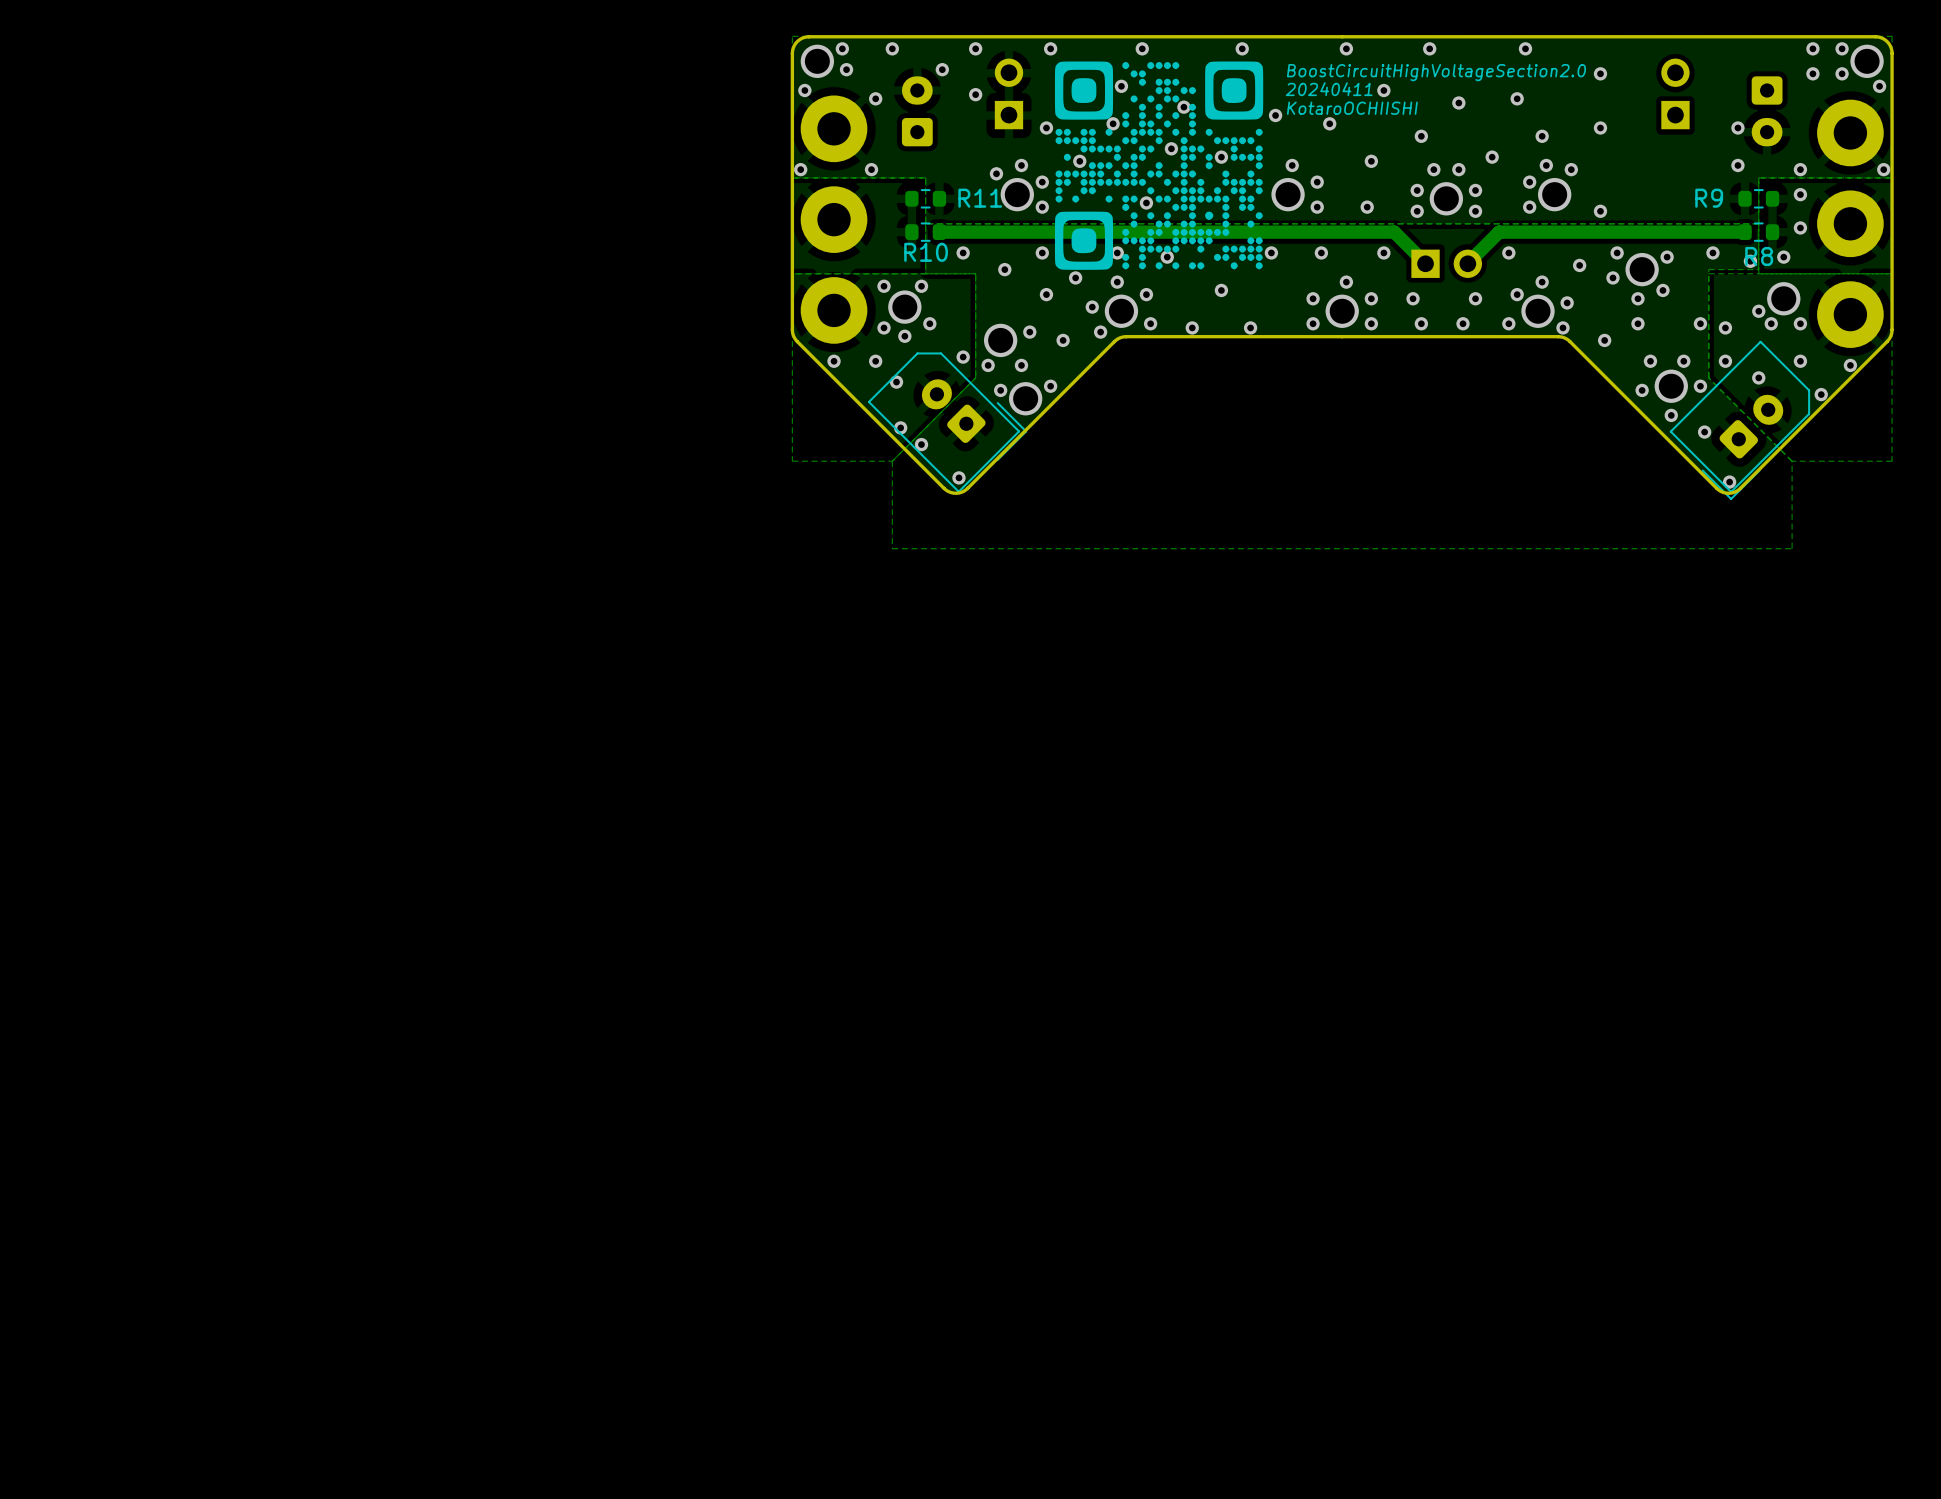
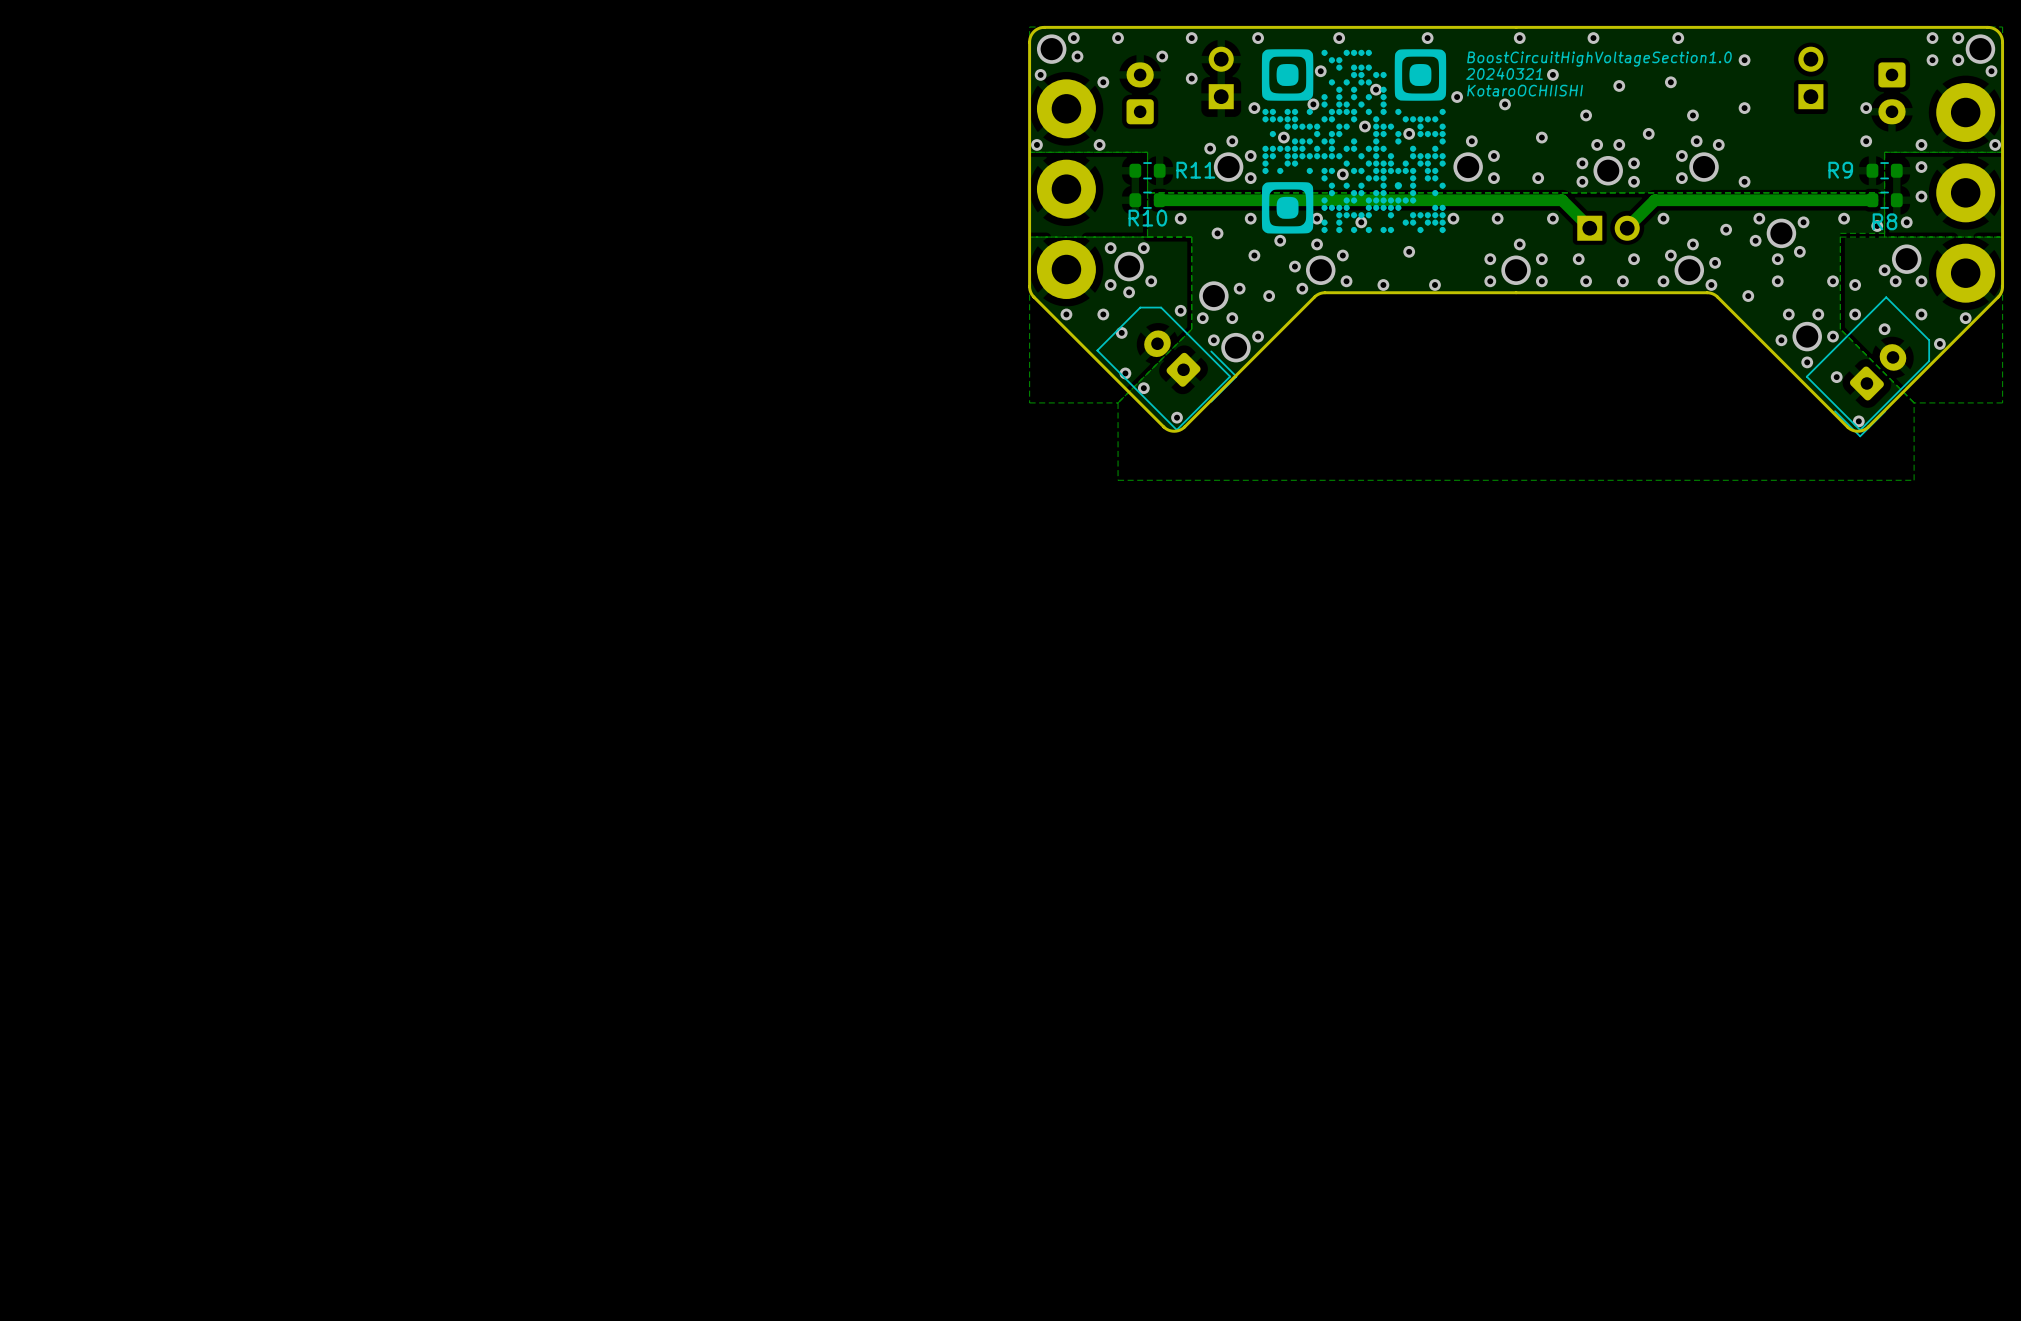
text: BoostCircuitHighVoltageSection2.0 (1436, 72) -> BoostCircuitHighVoltageSection1.0 (1599, 59)
text: 20240411 (1329, 89) -> 20240321 (1504, 73)

